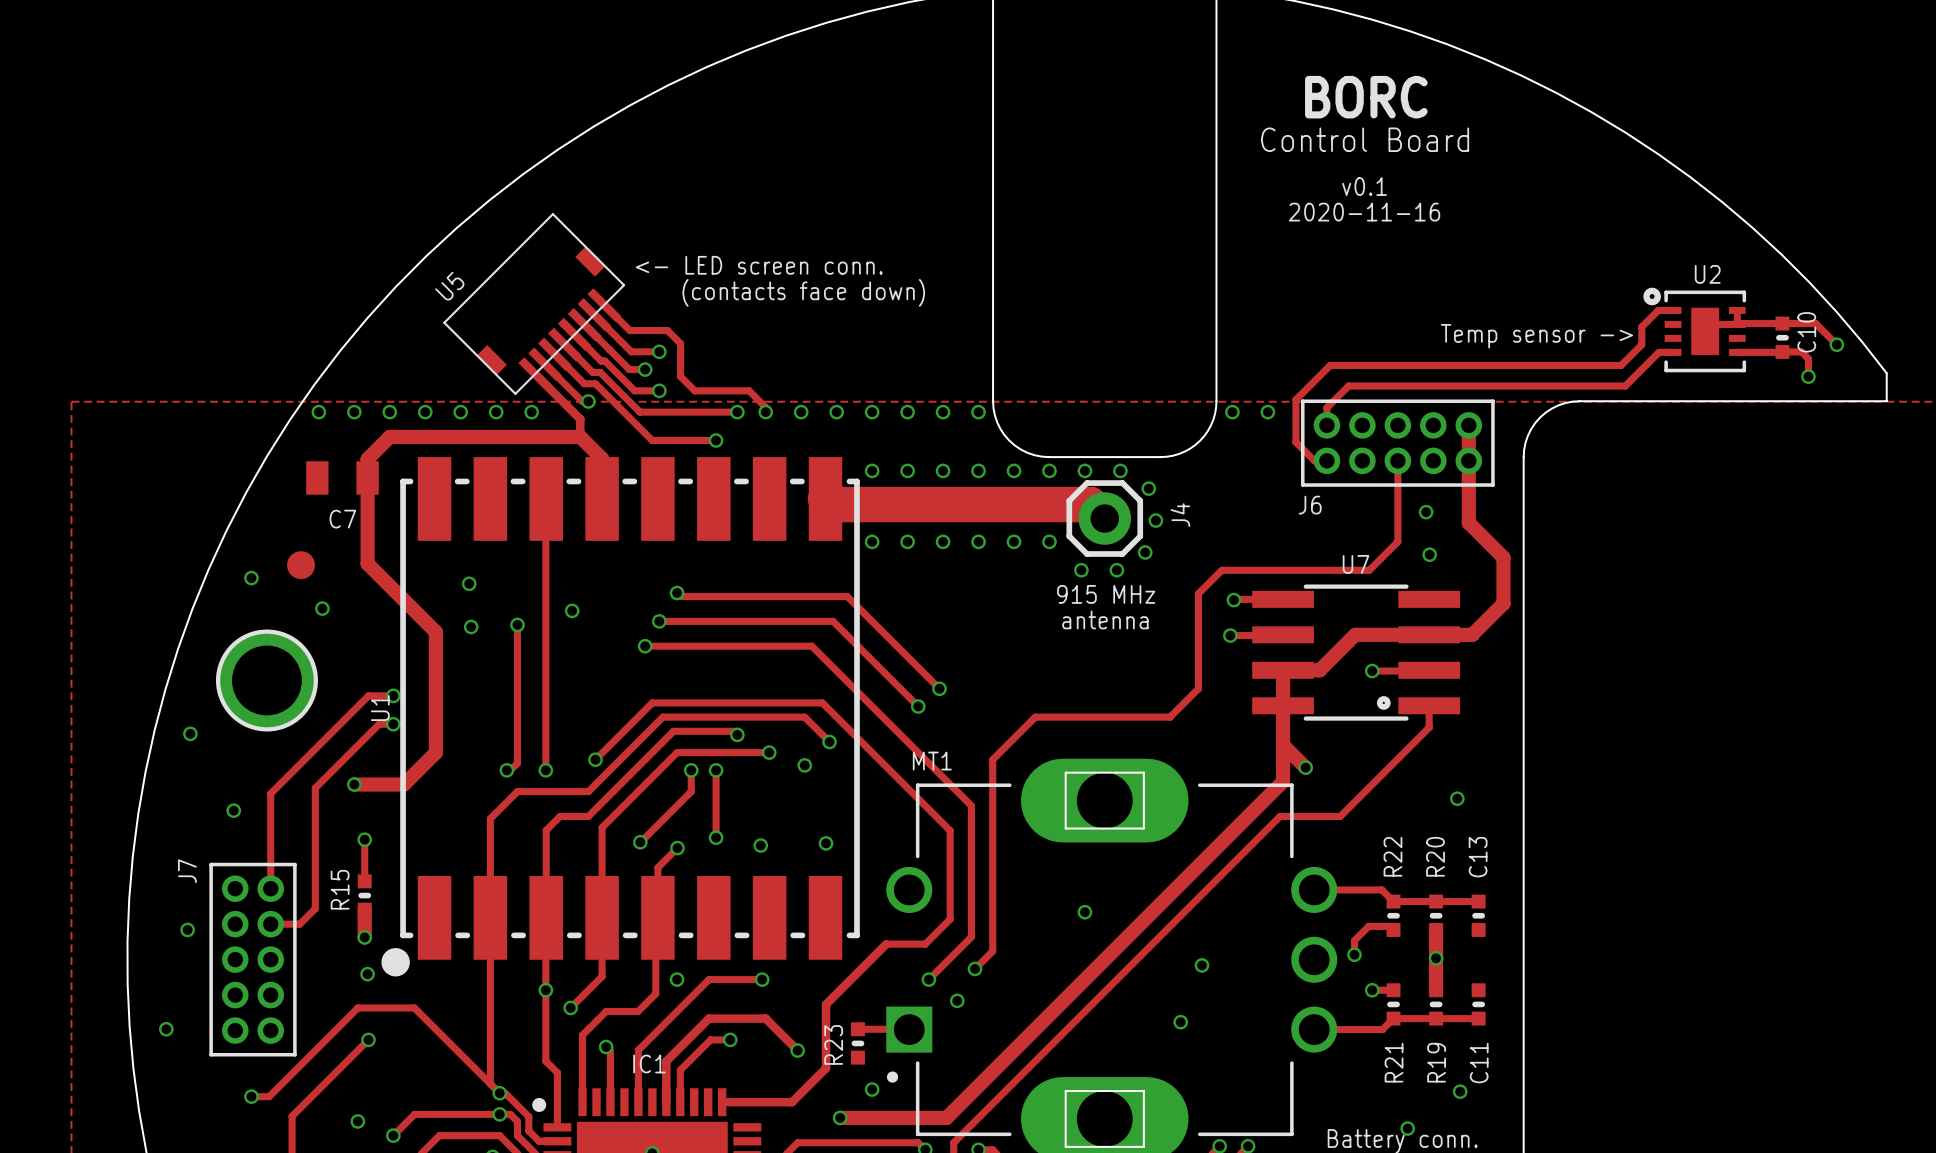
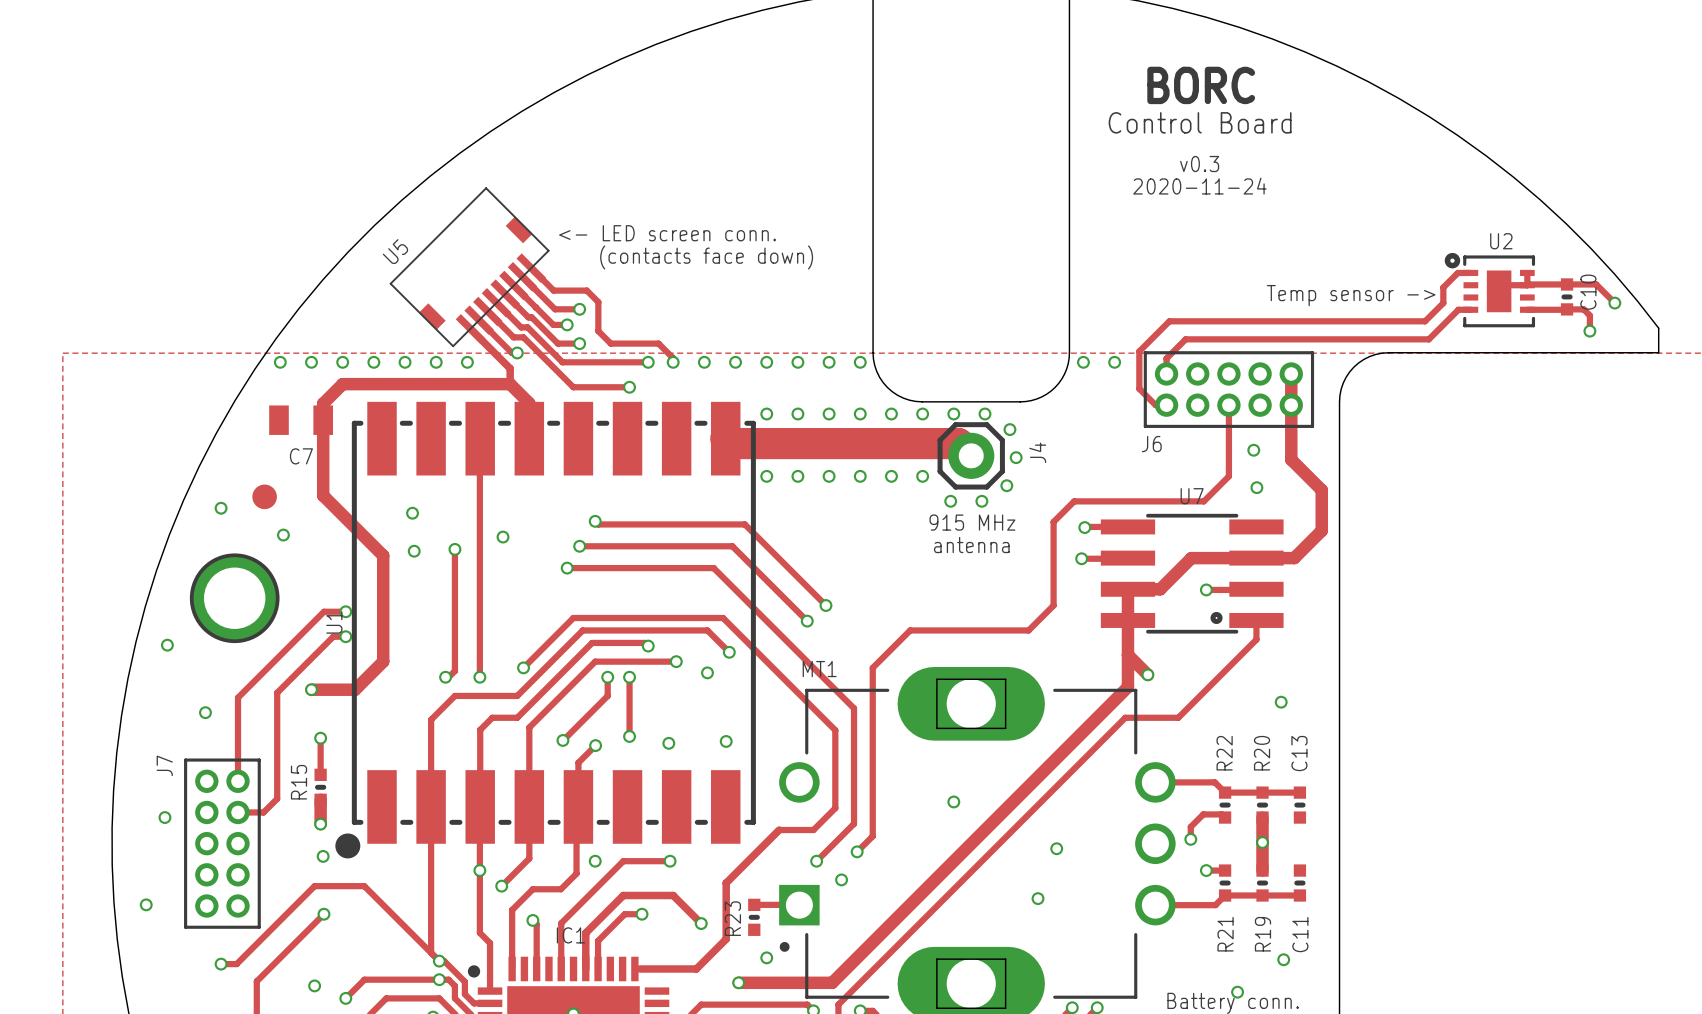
text: v0.1 (1364, 186) -> v0.3 (1199, 164)
text: 2020-11-16 (1364, 212) -> 2020-11-24 (1199, 186)

